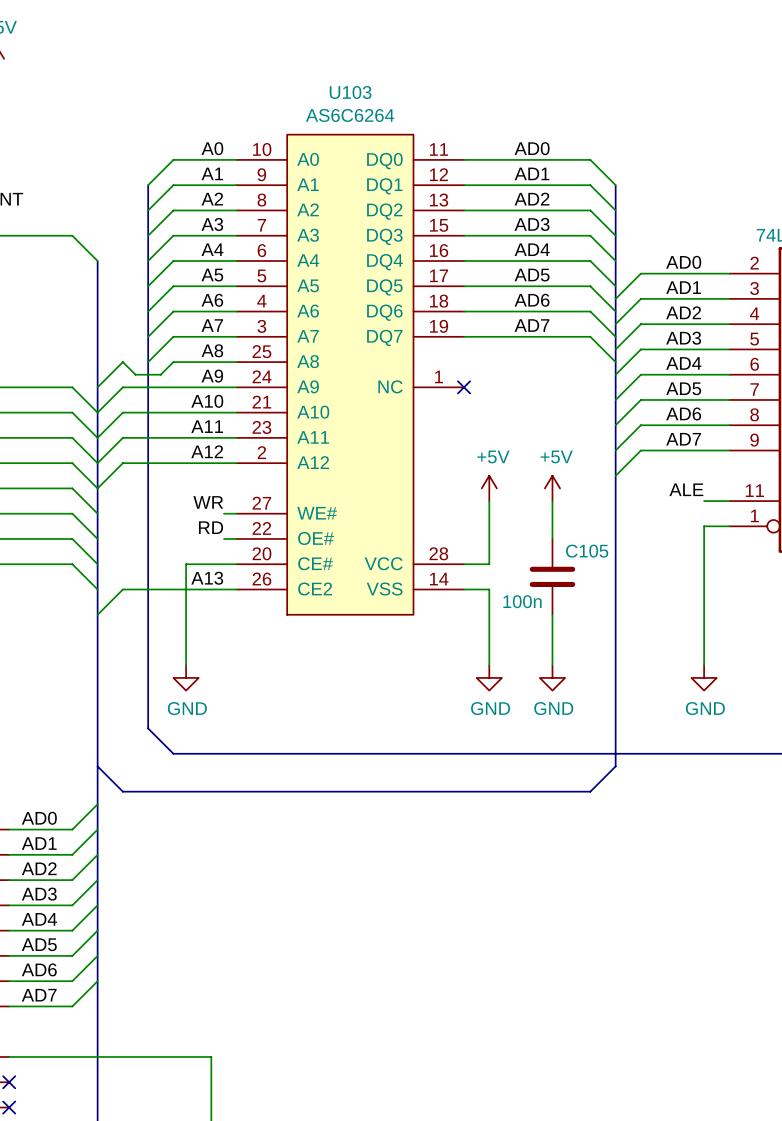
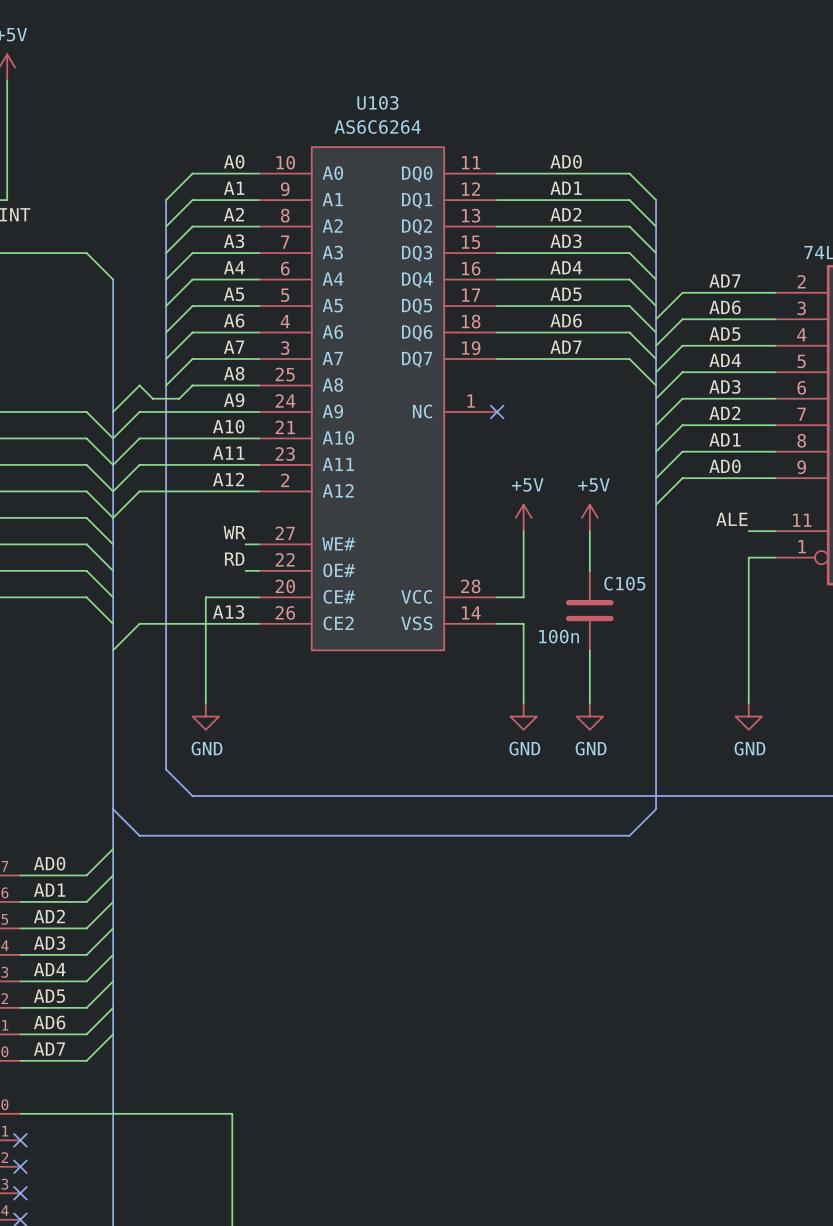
label: AD0 (683, 262) -> AD7 (724, 280)
label: AD1 (683, 287) -> AD6 (725, 307)
label: AD2 (683, 312) -> AD5 (724, 334)
label: AD3 (683, 338) -> AD4 (725, 360)
label: AD4 (683, 363) -> AD3 (724, 386)
label: AD5 (683, 388) -> AD2 (724, 413)
label: AD6 (683, 413) -> AD1 (724, 439)
label: AD7 (683, 439) -> AD0 (725, 466)

